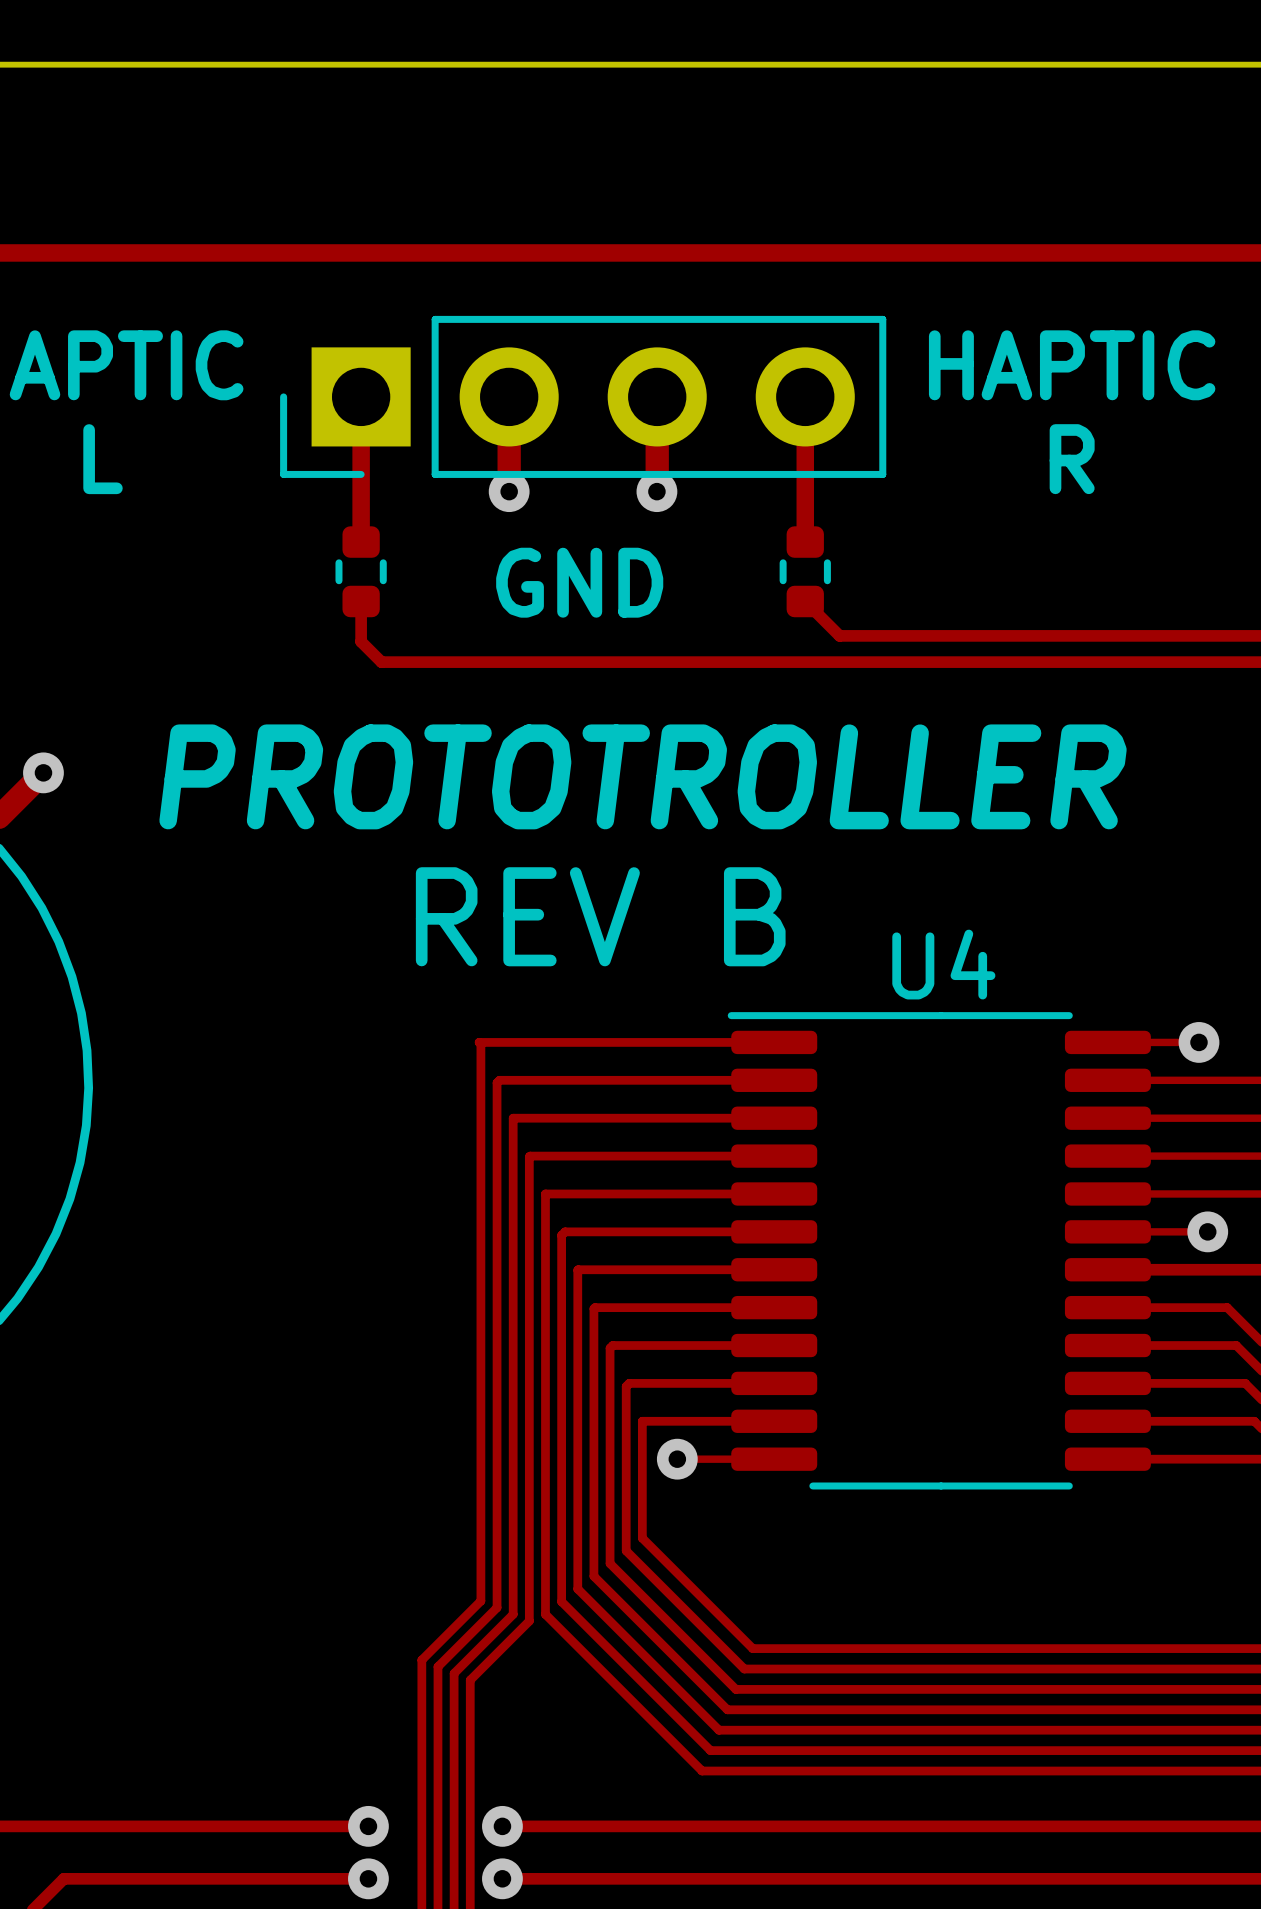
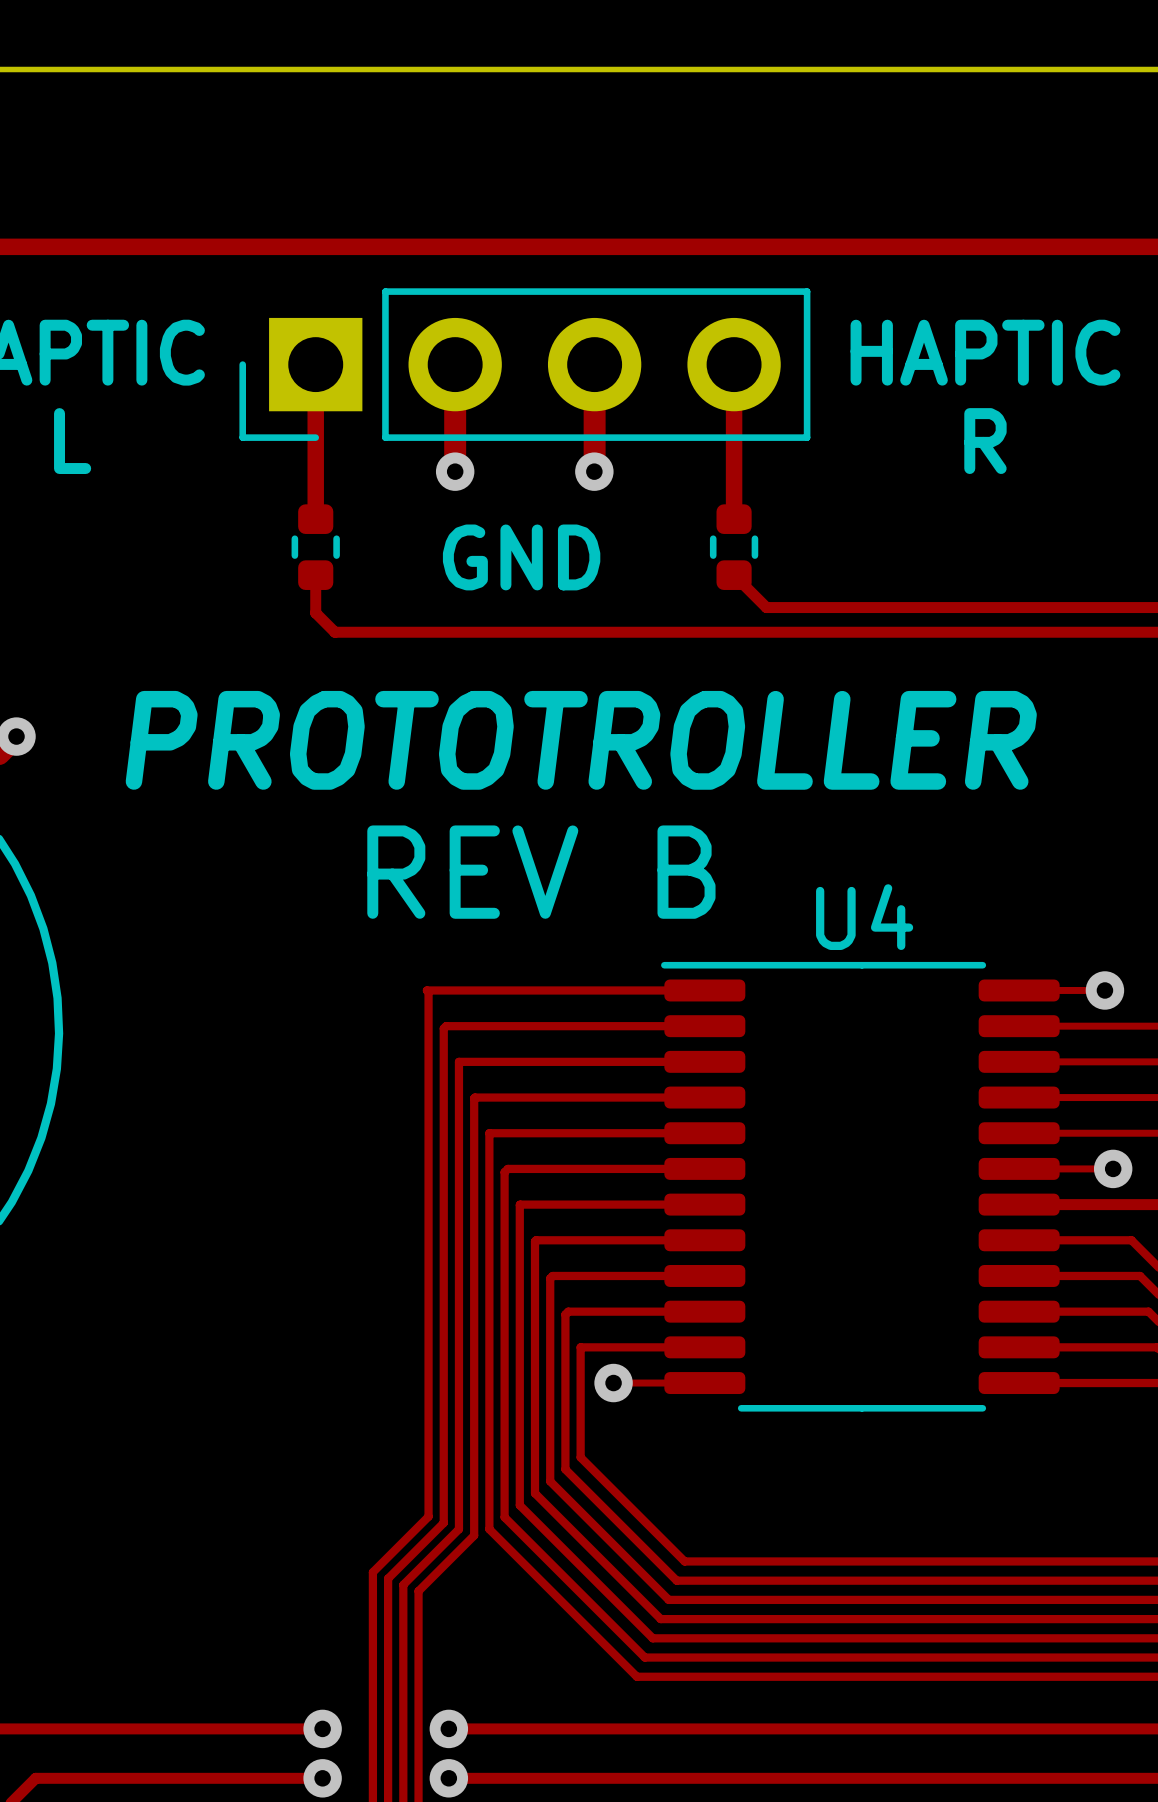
part position: (583, 396) -> (524, 364)

